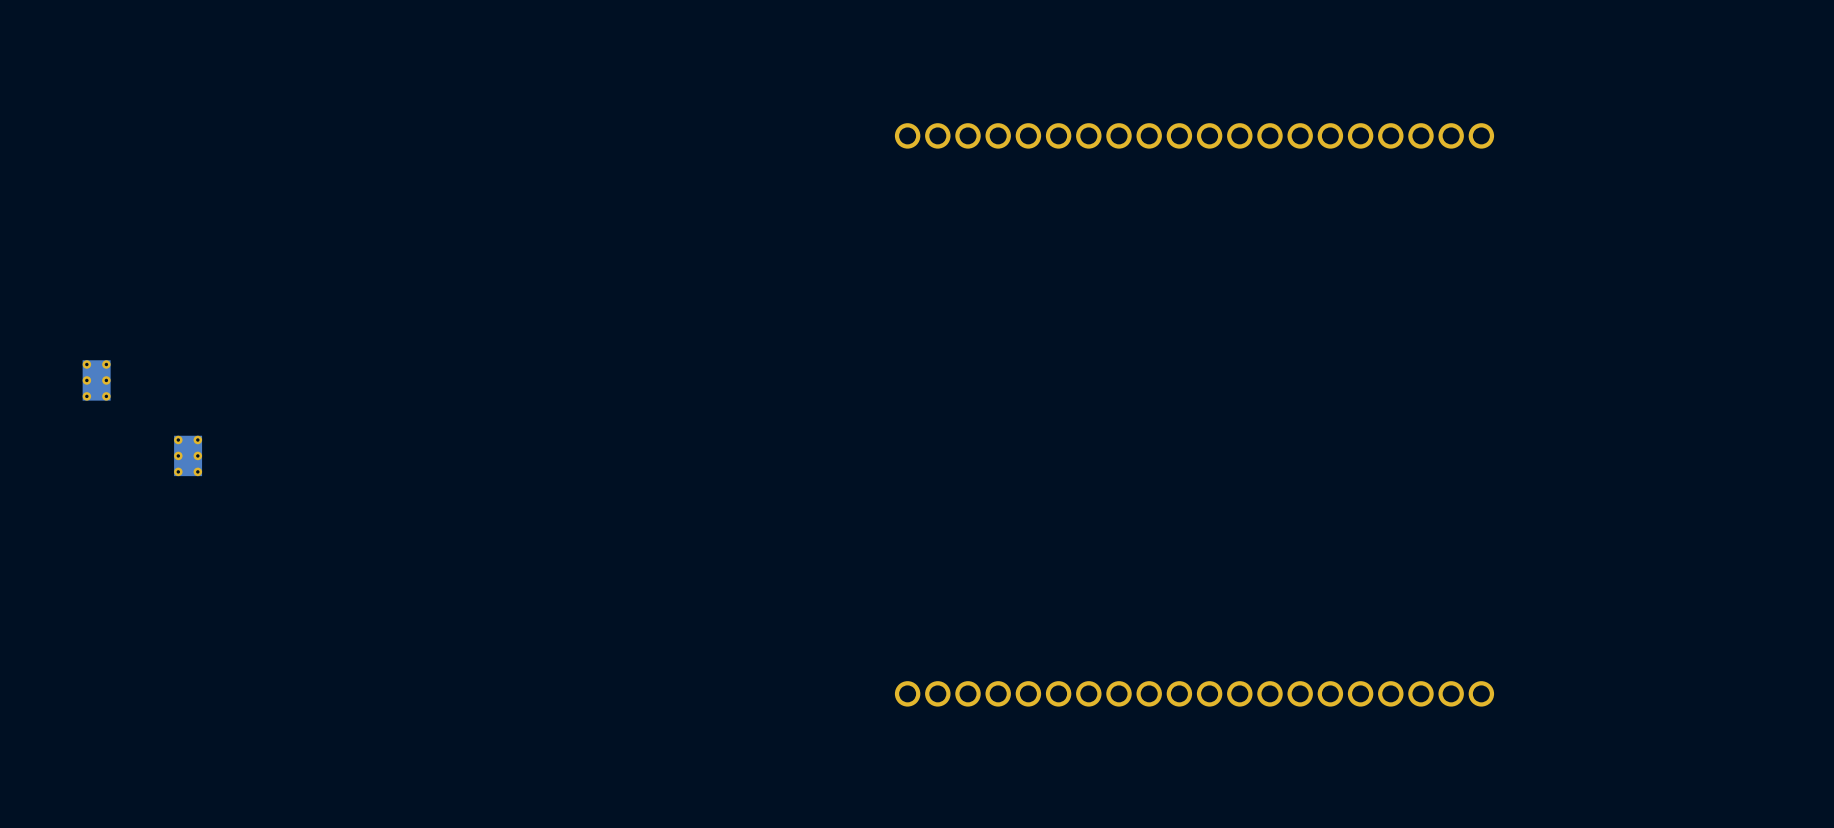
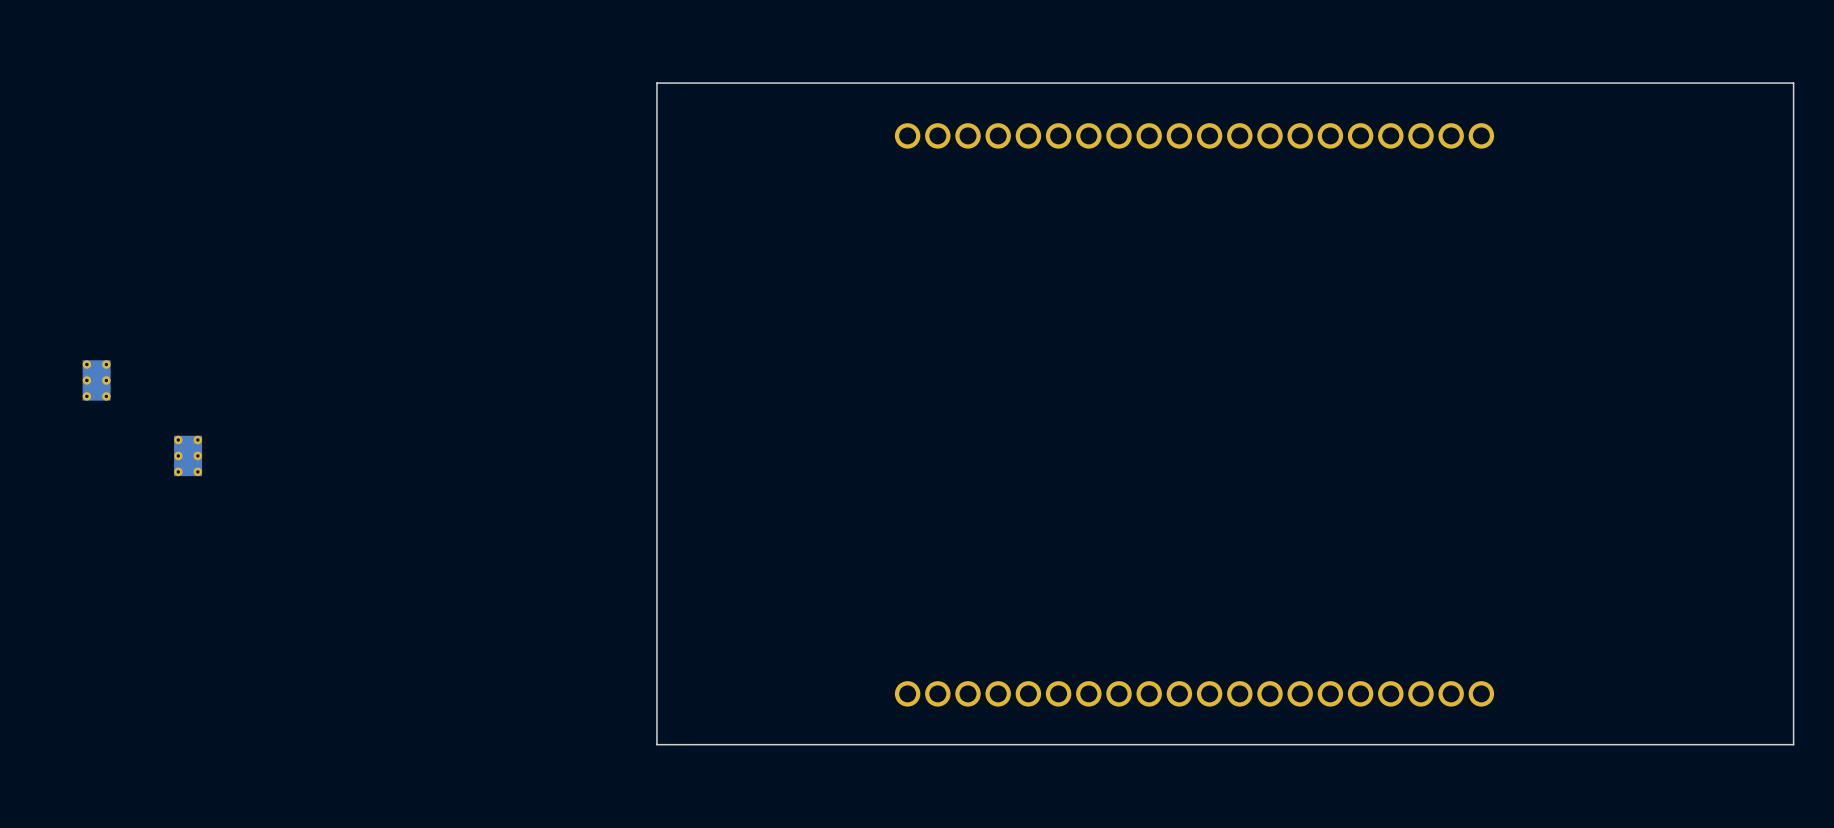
board edge: none -> (1793, 83) (656, 83) (656, 744) (1793, 744) (1793, 83)

